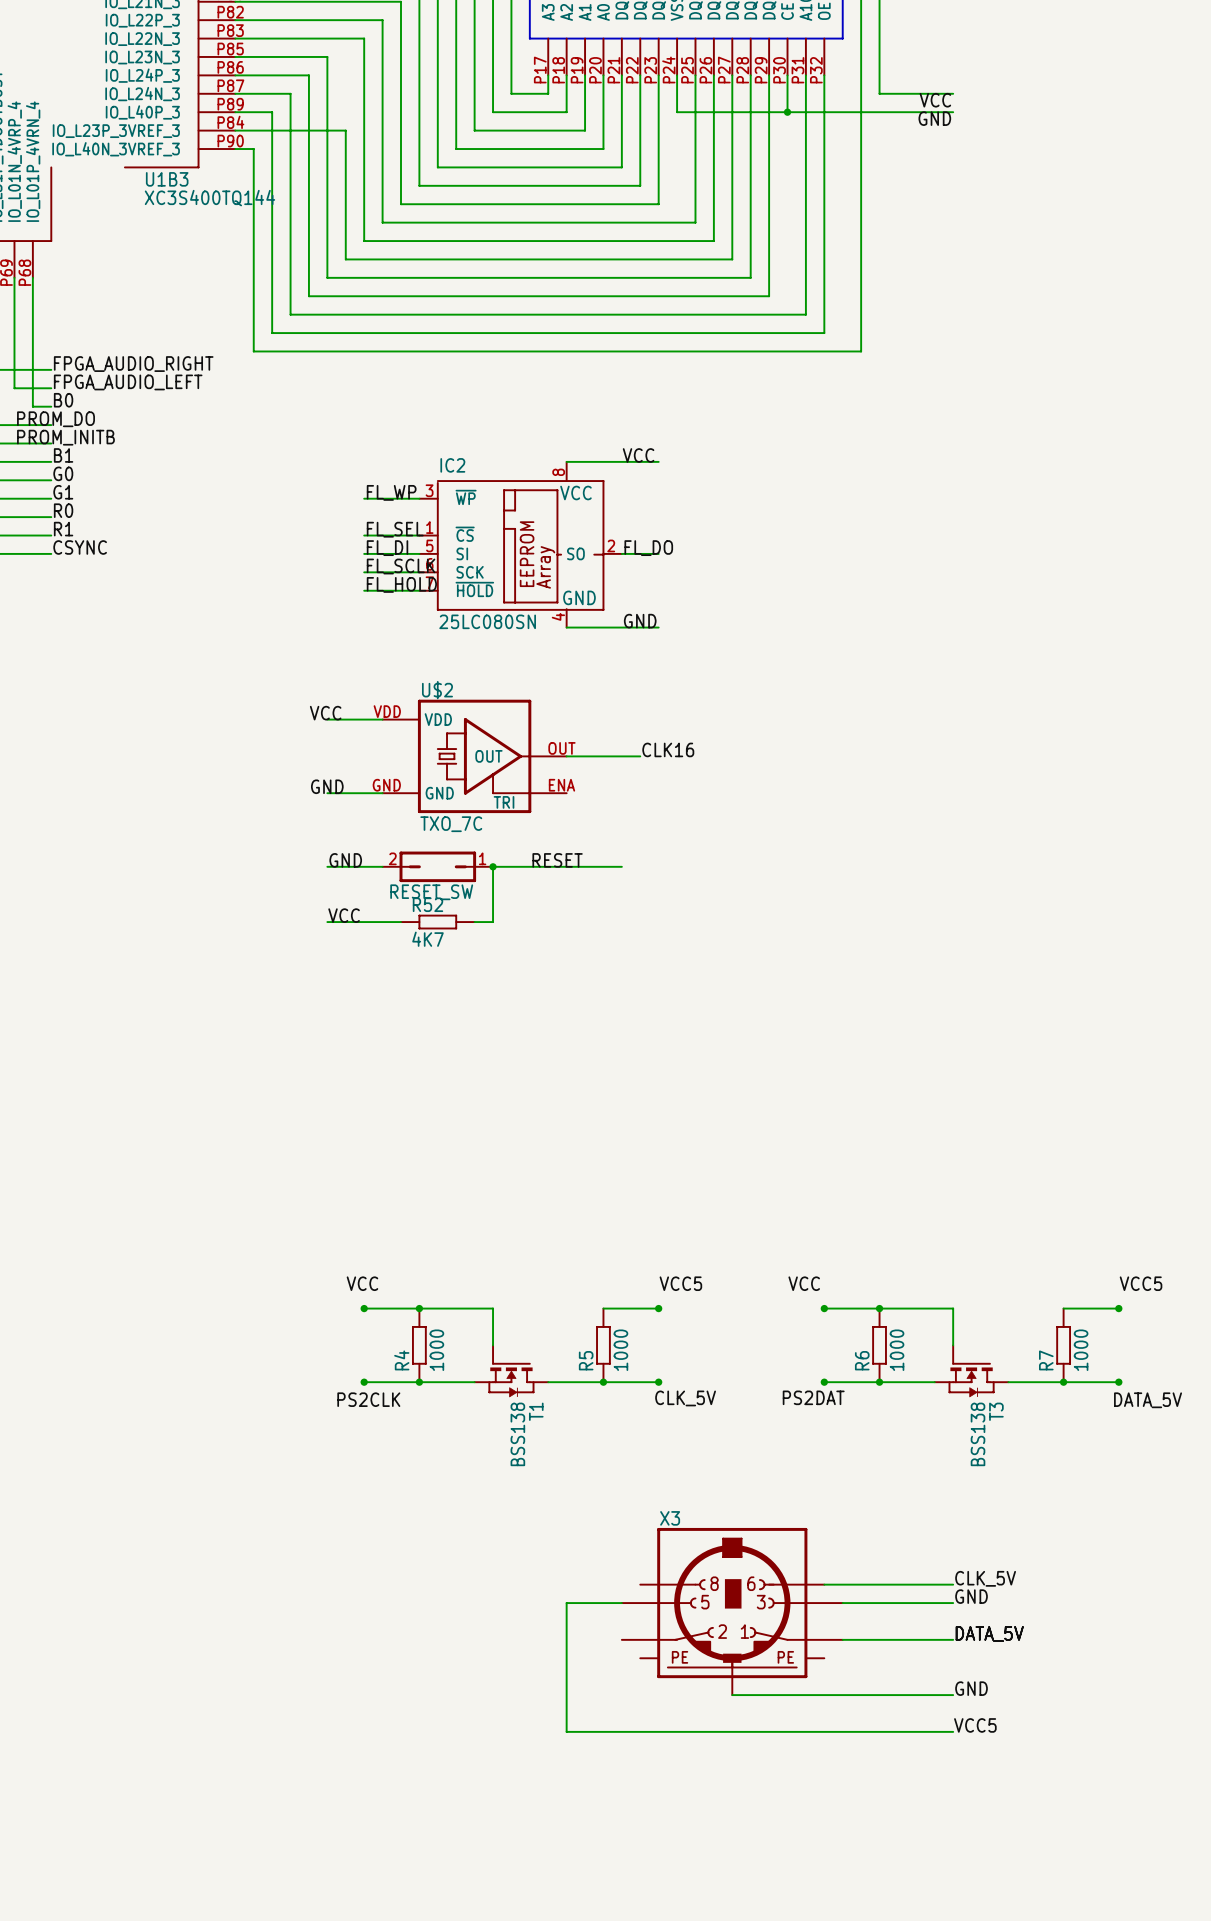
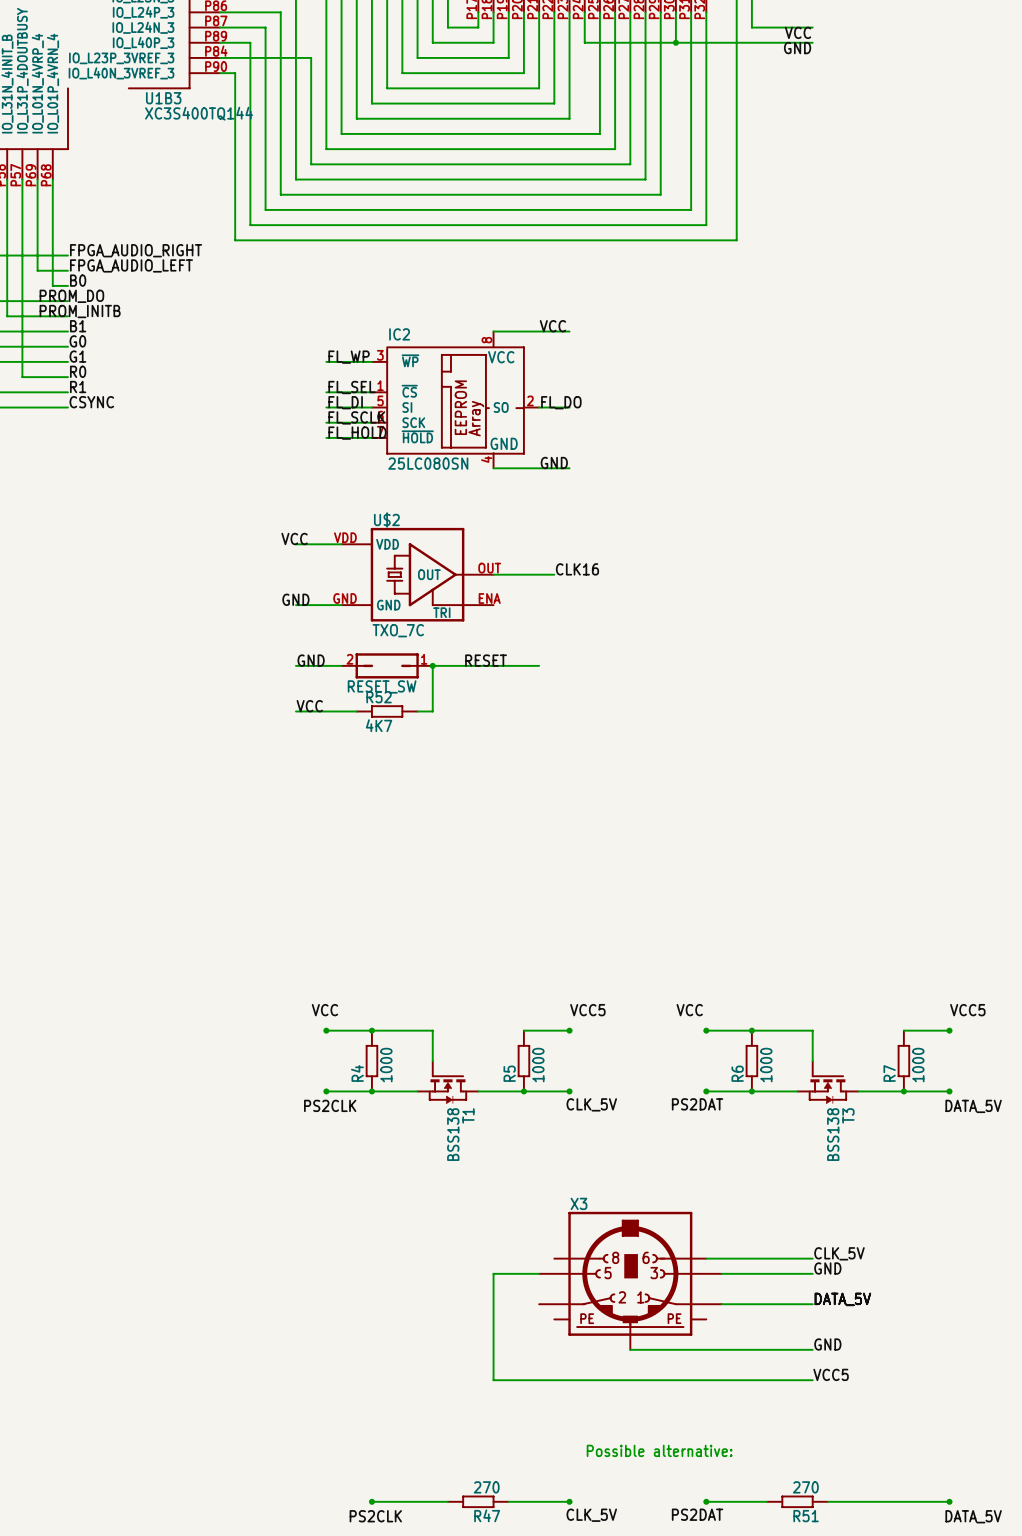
text: none -> Possible alternative: (659, 1450)
wire: none -> (371, 1501) (447, 1501)
junction: none -> (371, 1501)
R47: none -> 270 (478, 1501)
wire: none -> (508, 1501) (569, 1501)
junction: none -> (569, 1501)
wire: none -> (706, 1501) (767, 1501)
junction: none -> (706, 1501)
R51: none -> 270 (797, 1501)
wire: none -> (827, 1501) (949, 1501)
junction: none -> (949, 1501)
label: none -> PS2DAT (697, 1514)
label: none -> CLK_5V (591, 1515)
label: none -> PS2CLK (375, 1516)
label: none -> DATA_5V (973, 1516)

